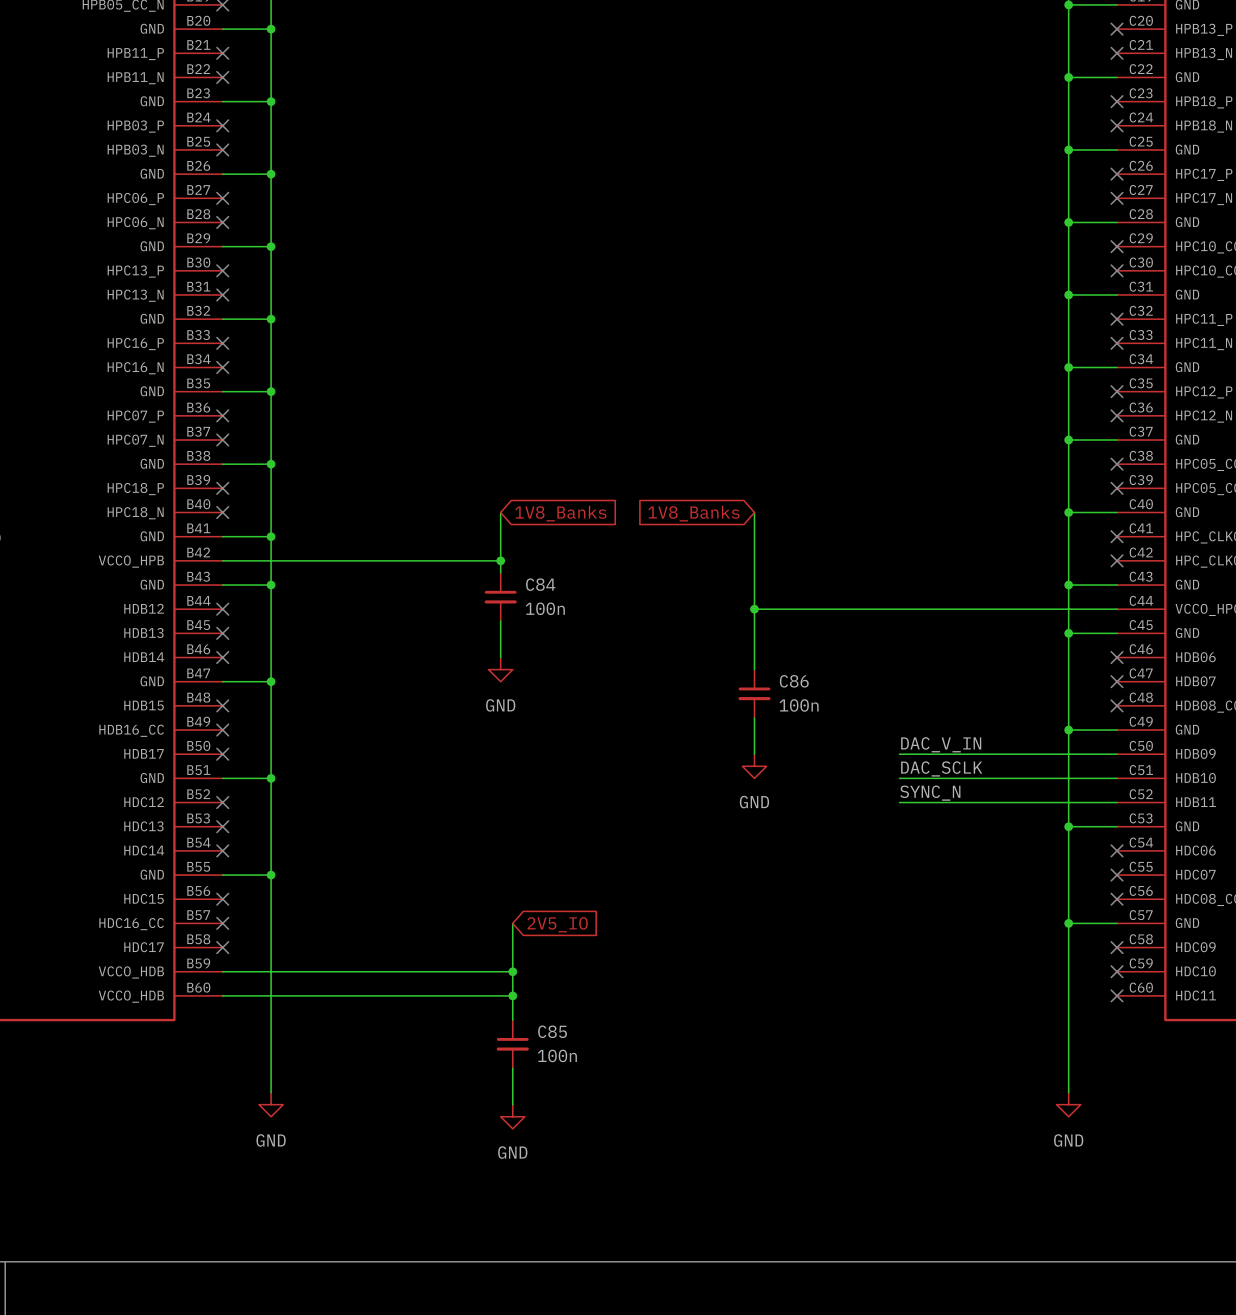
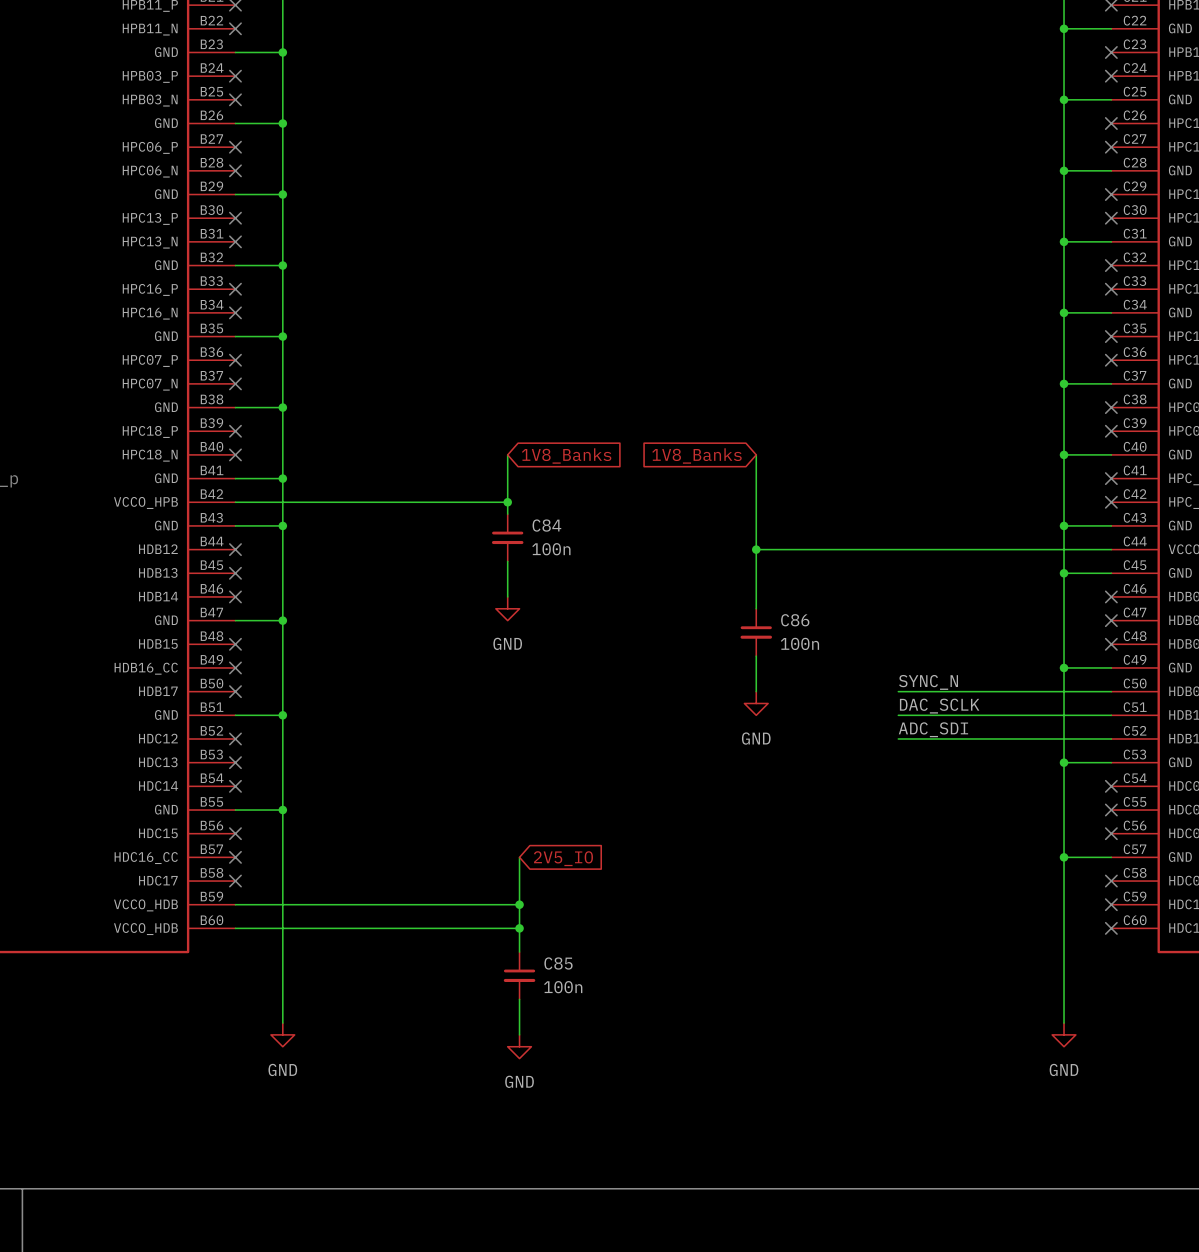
label: DAC_V_IN (941, 744) -> SYNC_N (928, 682)
label: SYNC_N (930, 793) -> ADC_SDI (933, 729)

